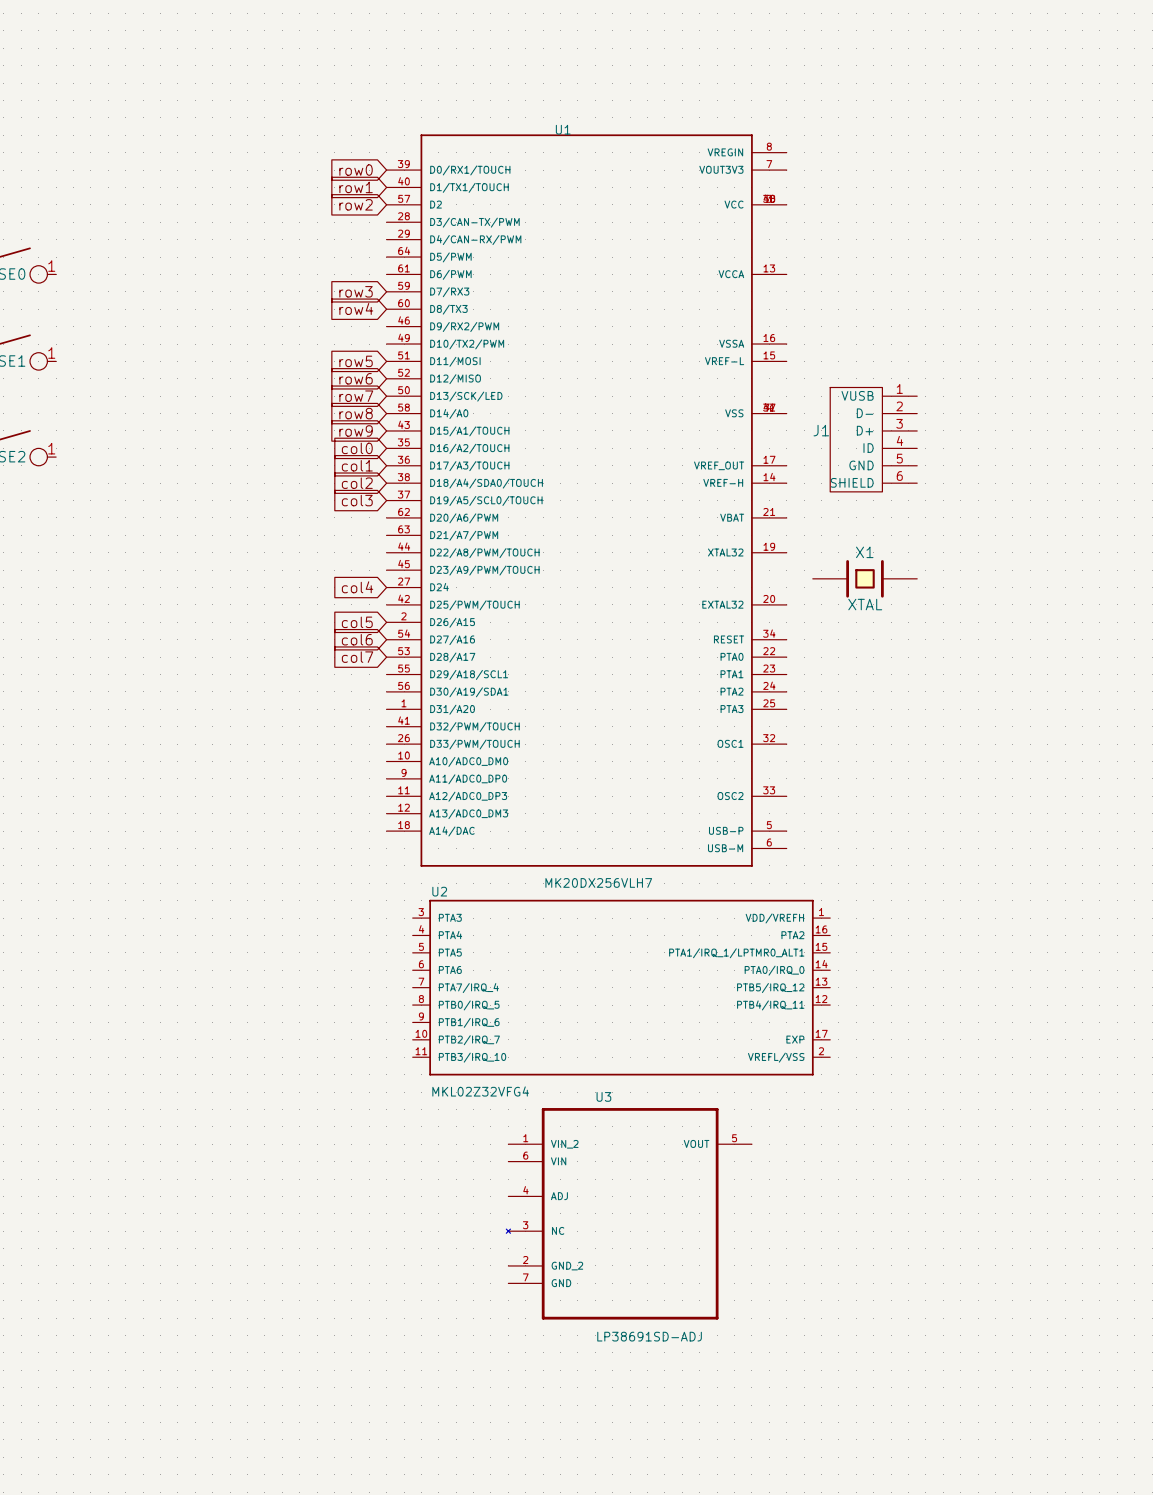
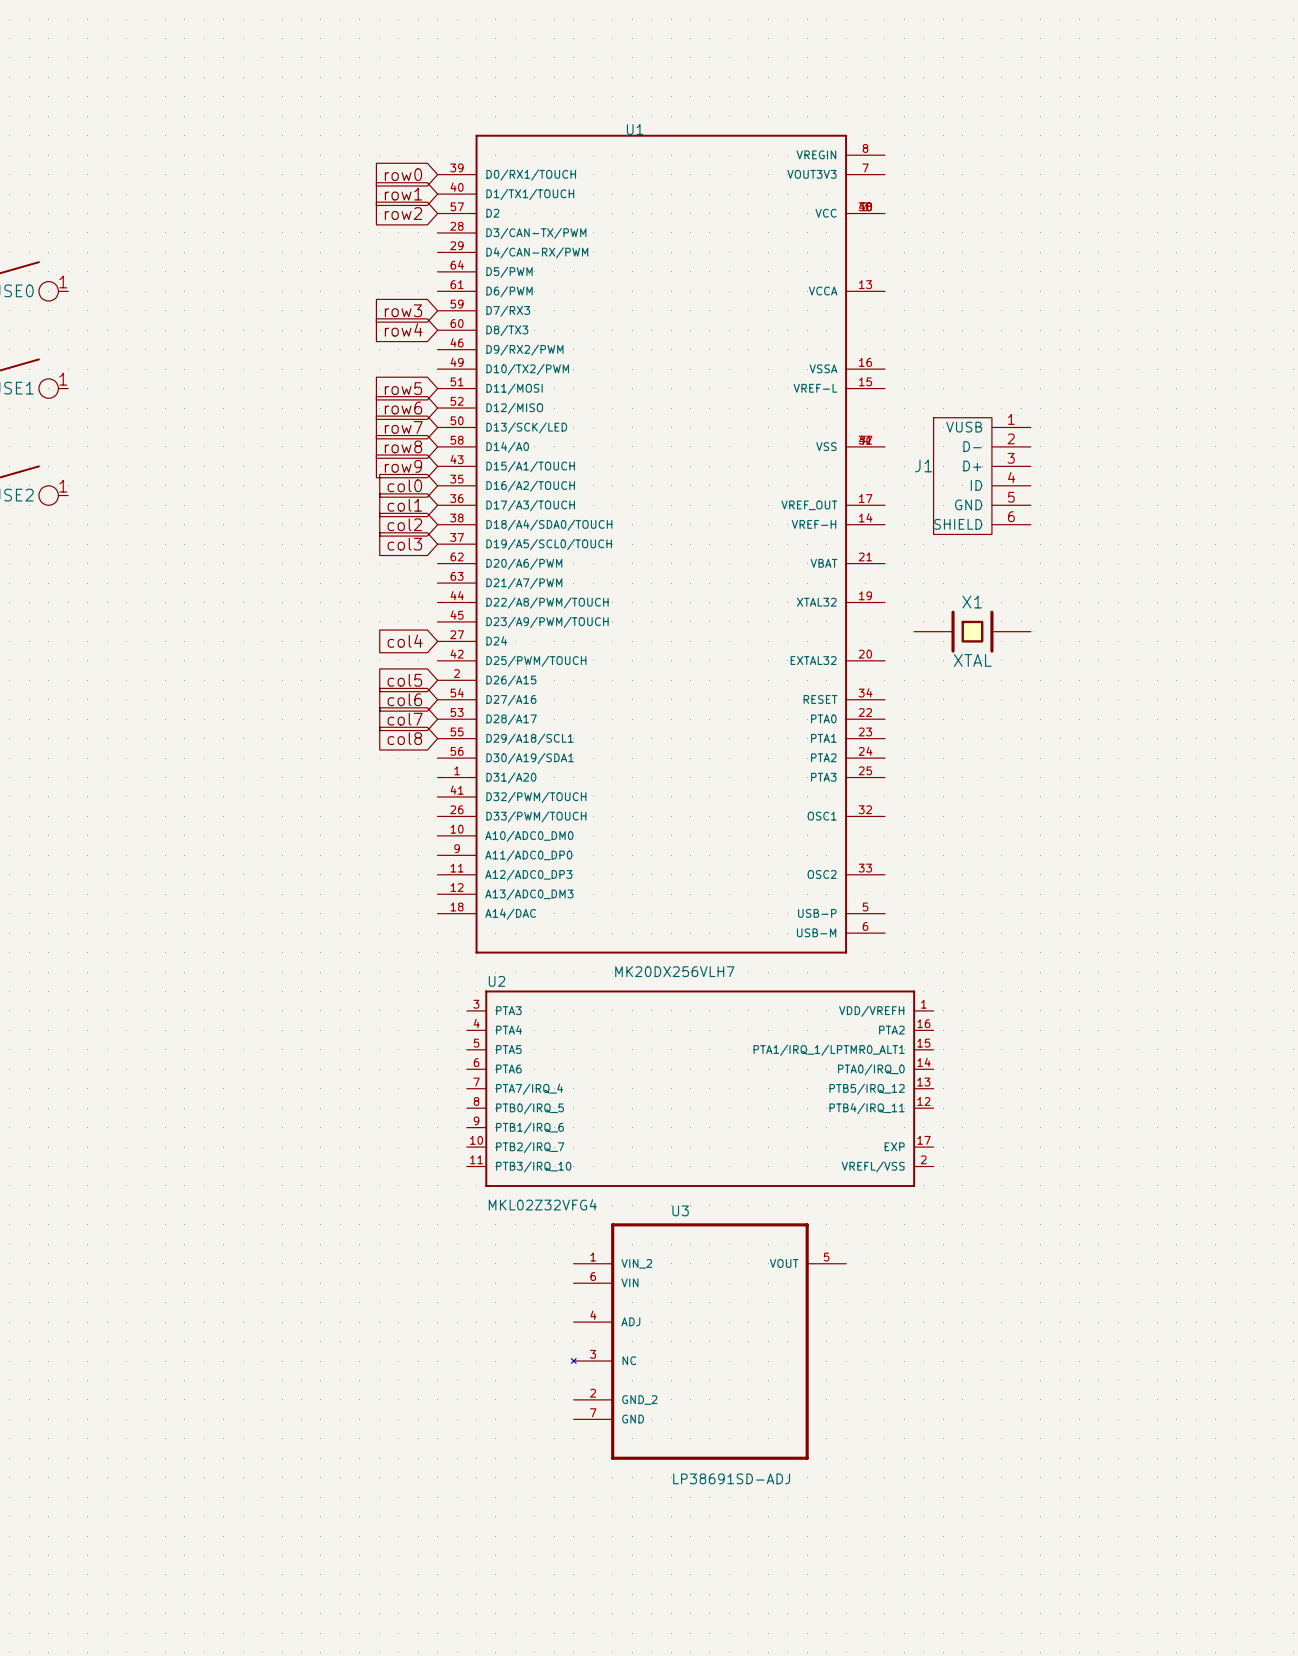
global label: none -> col8 (404, 738)

